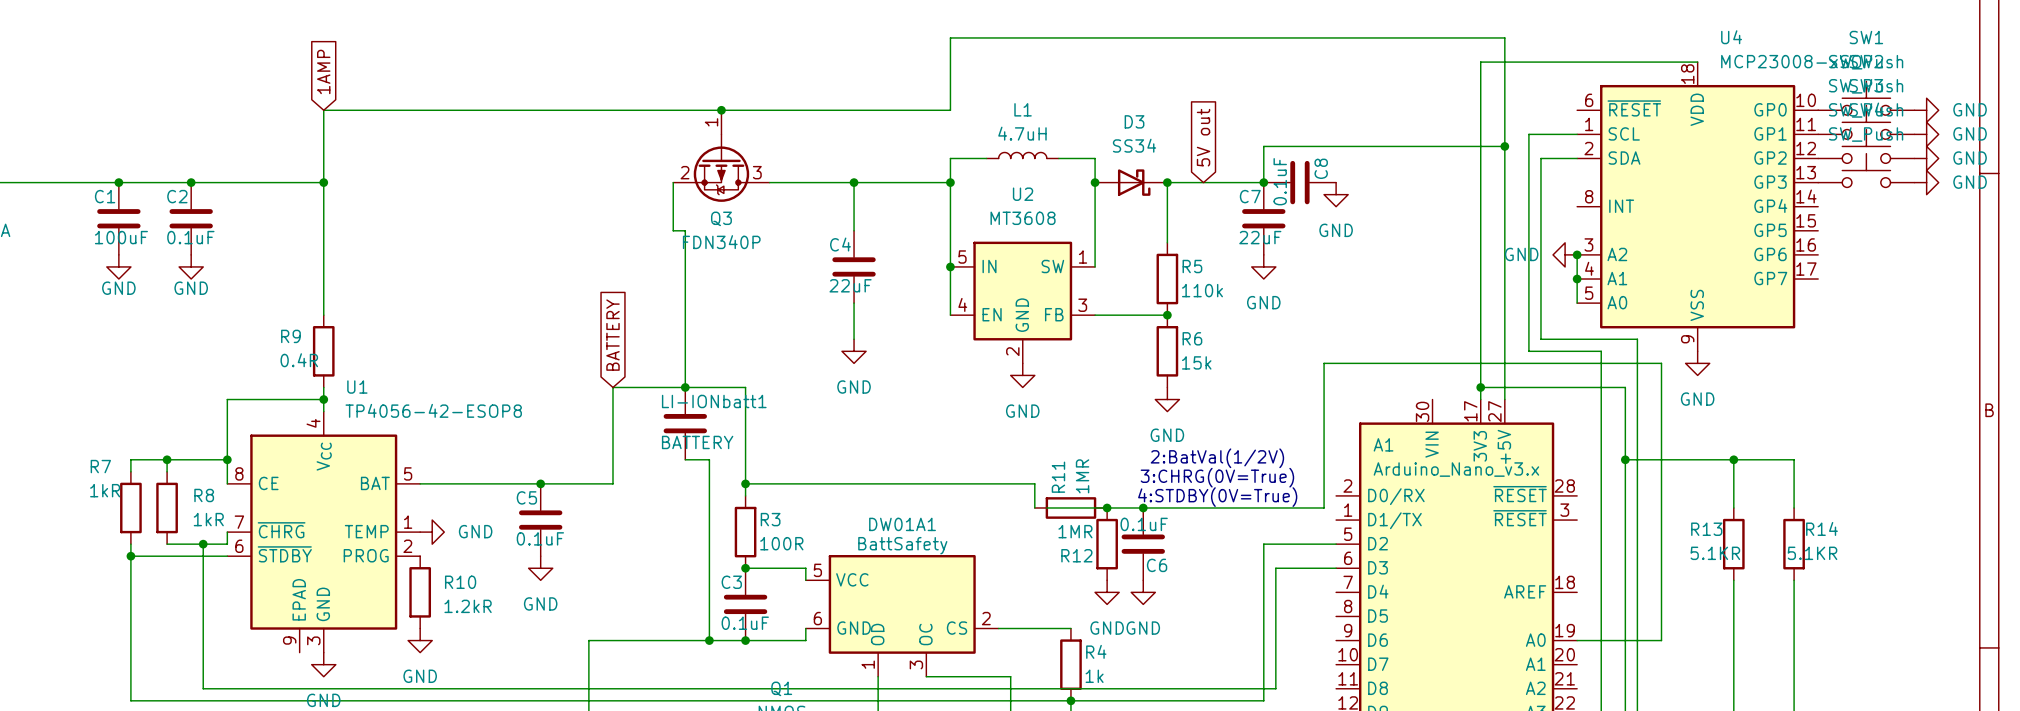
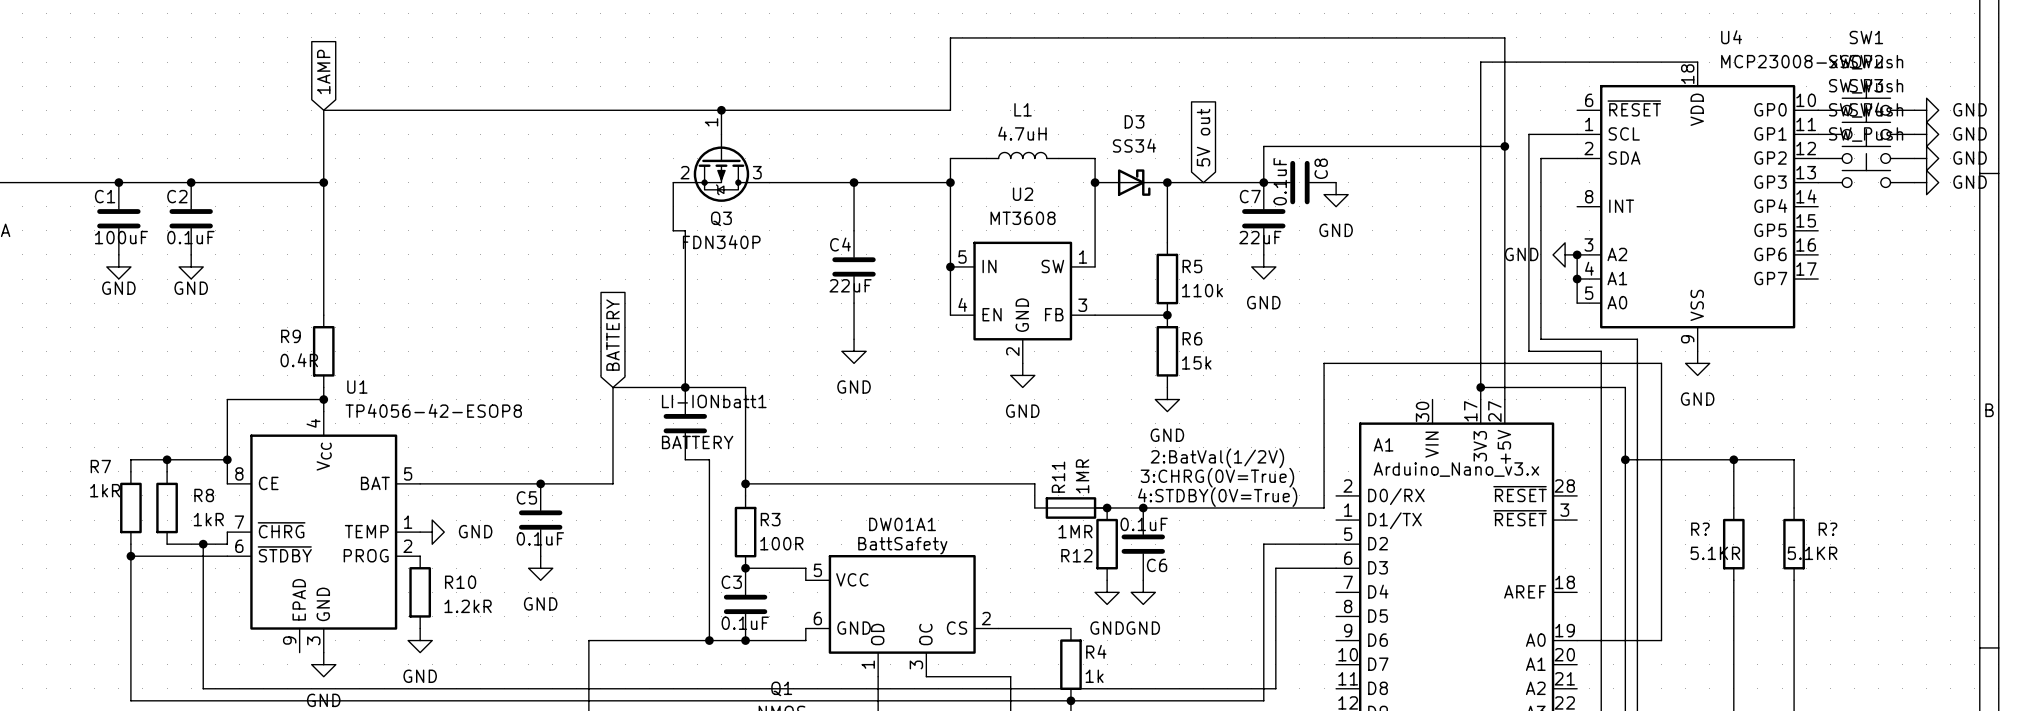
R14 name: R14 (1821, 528) -> R? (1828, 529)
R13 name: R13 (1706, 529) -> R? (1700, 529)

